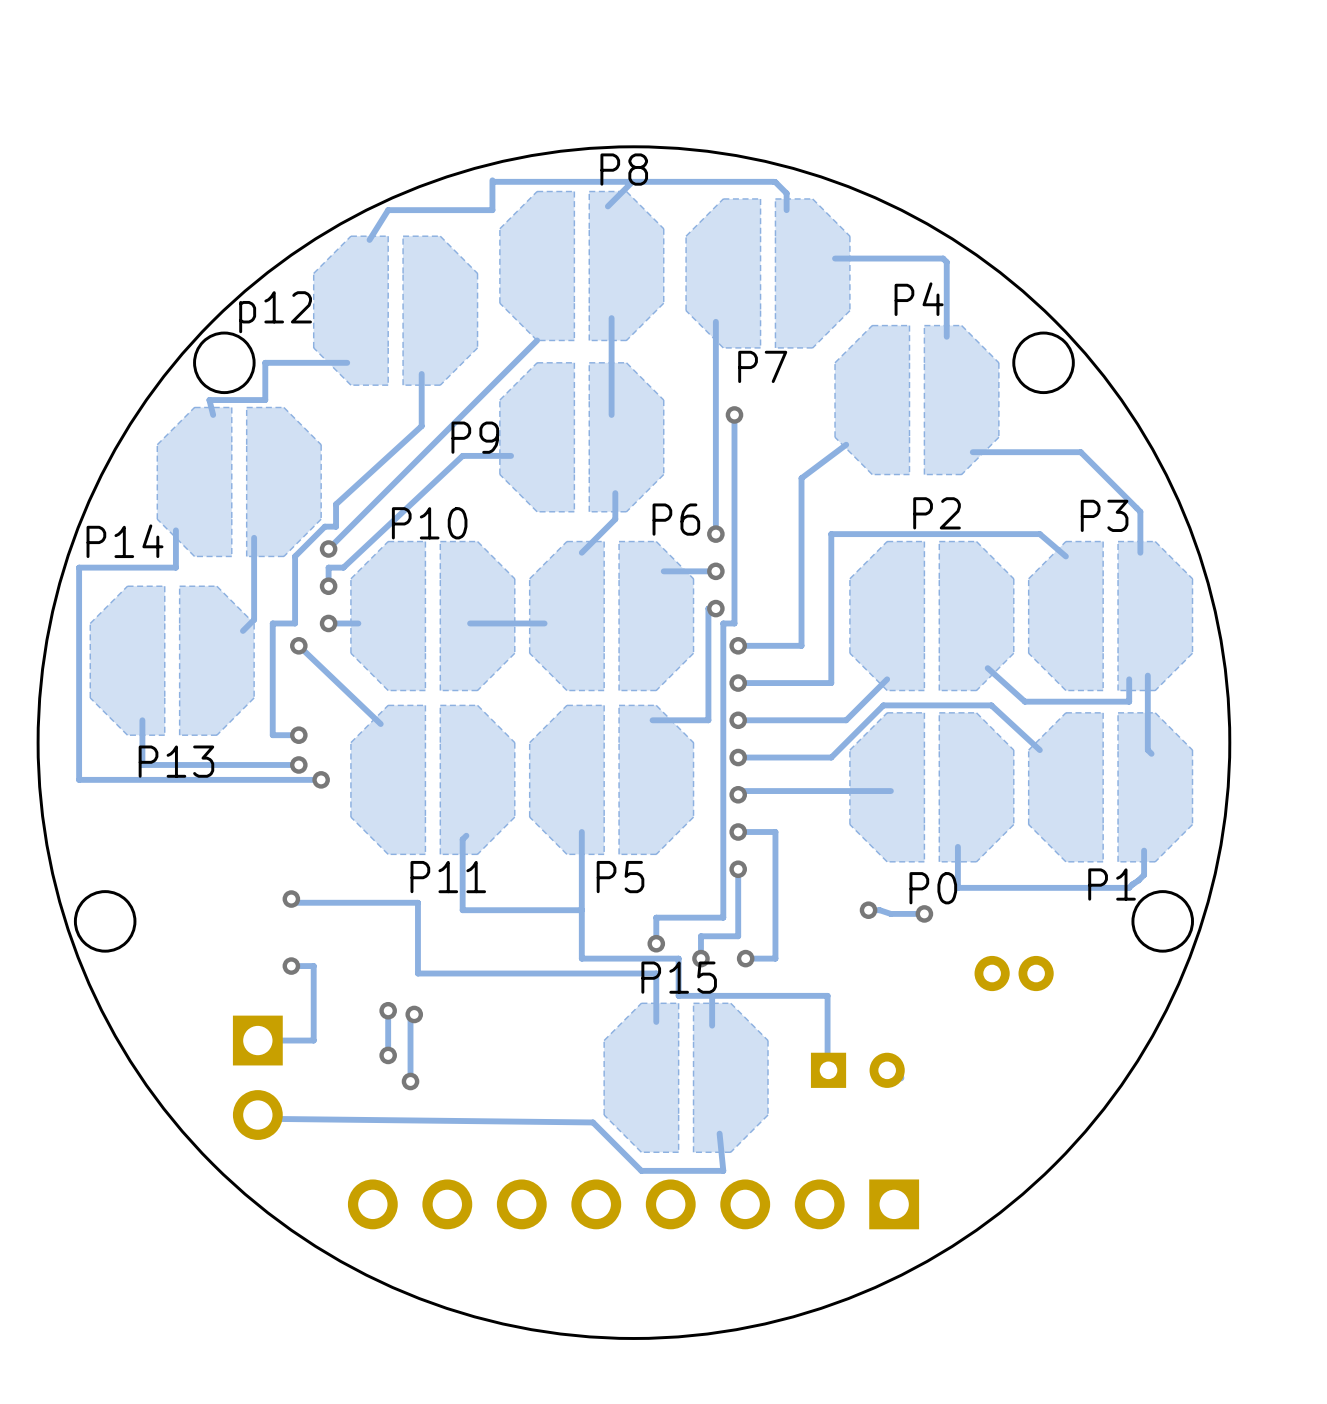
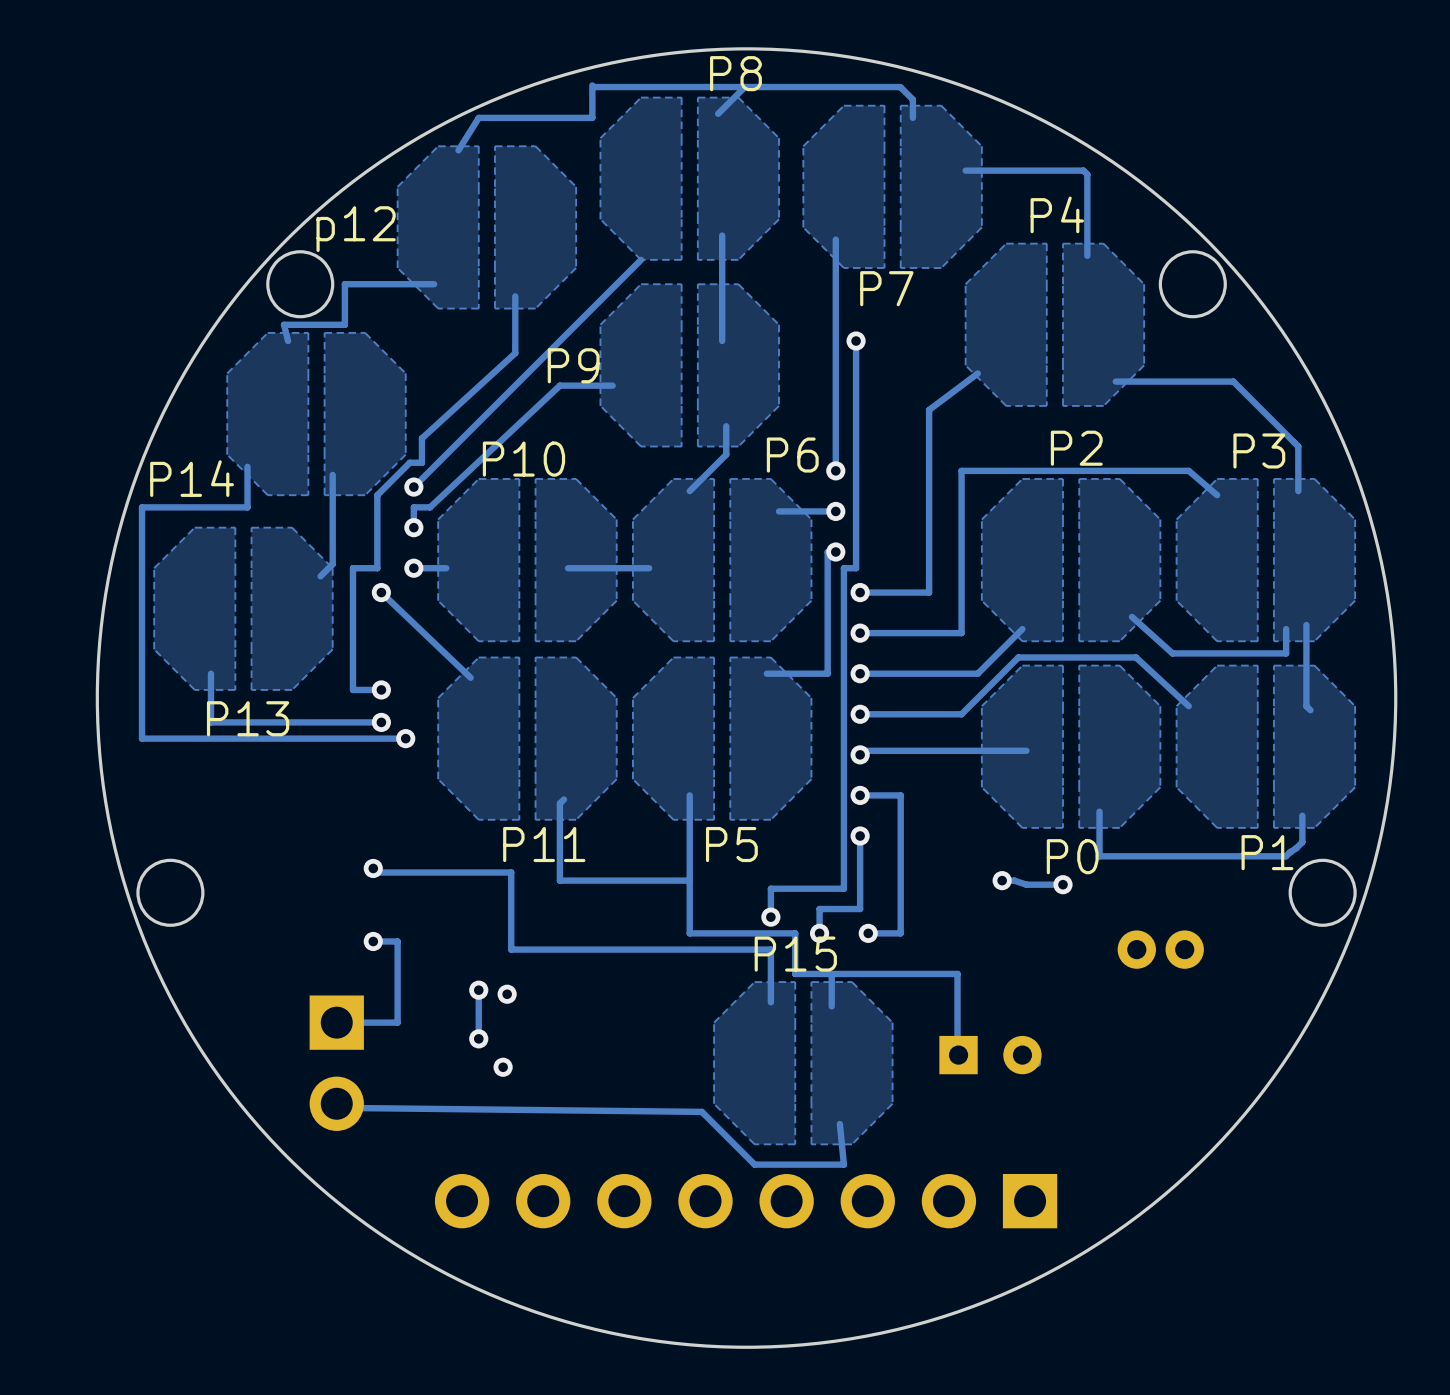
track: (410, 1018) (410, 1085) -> none

